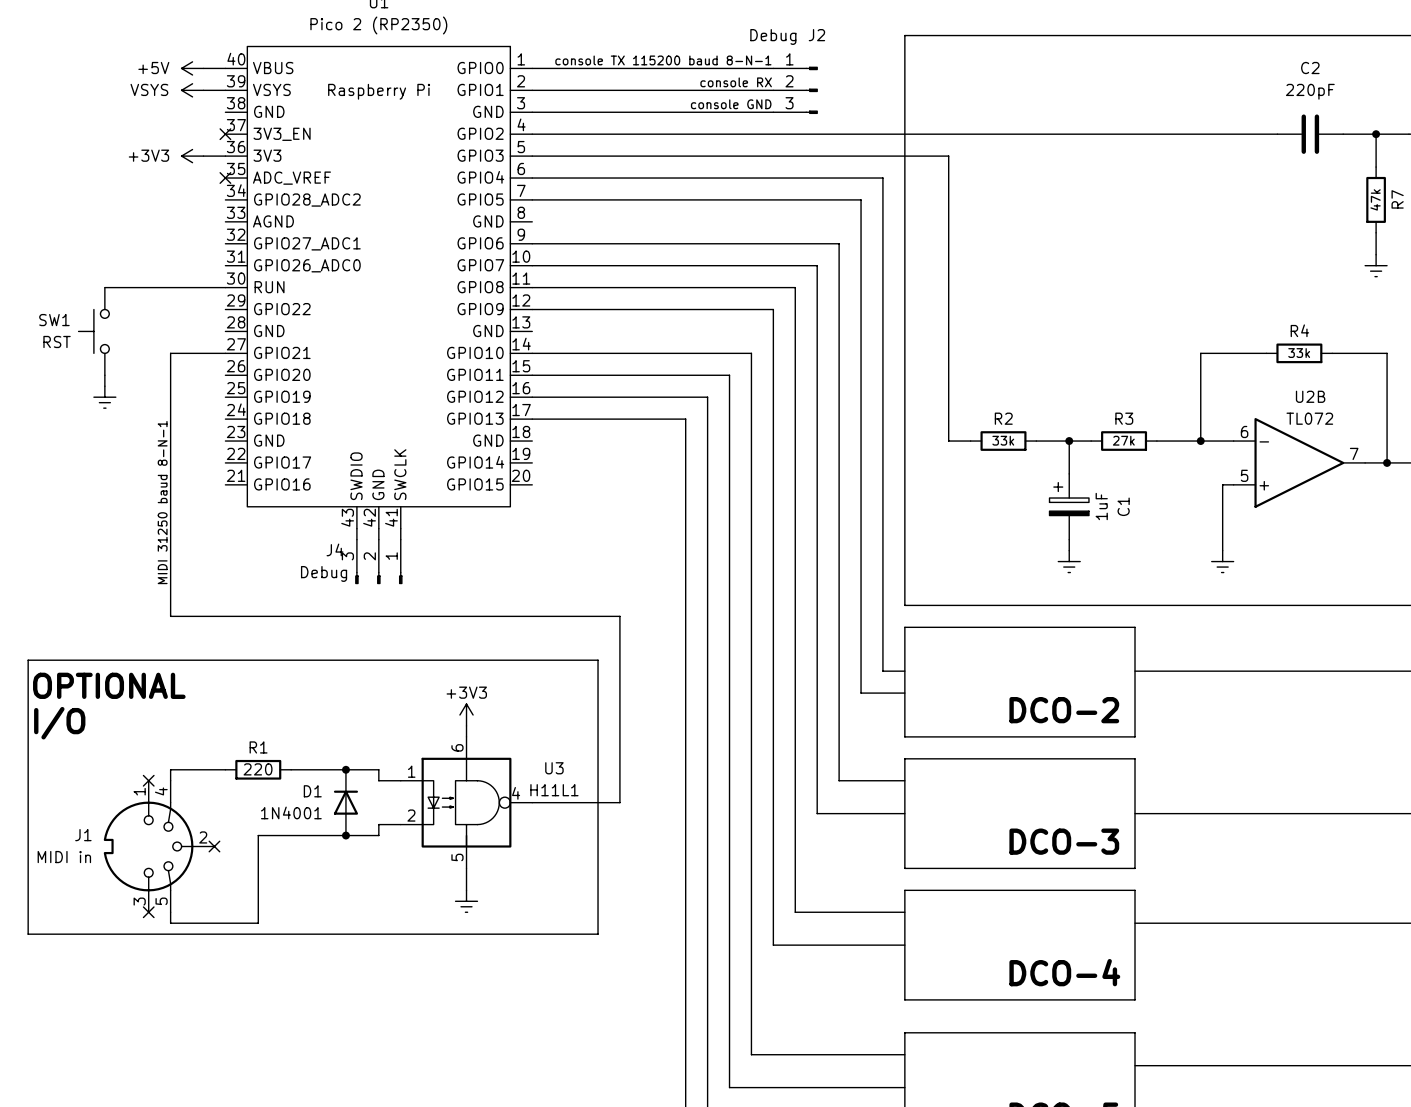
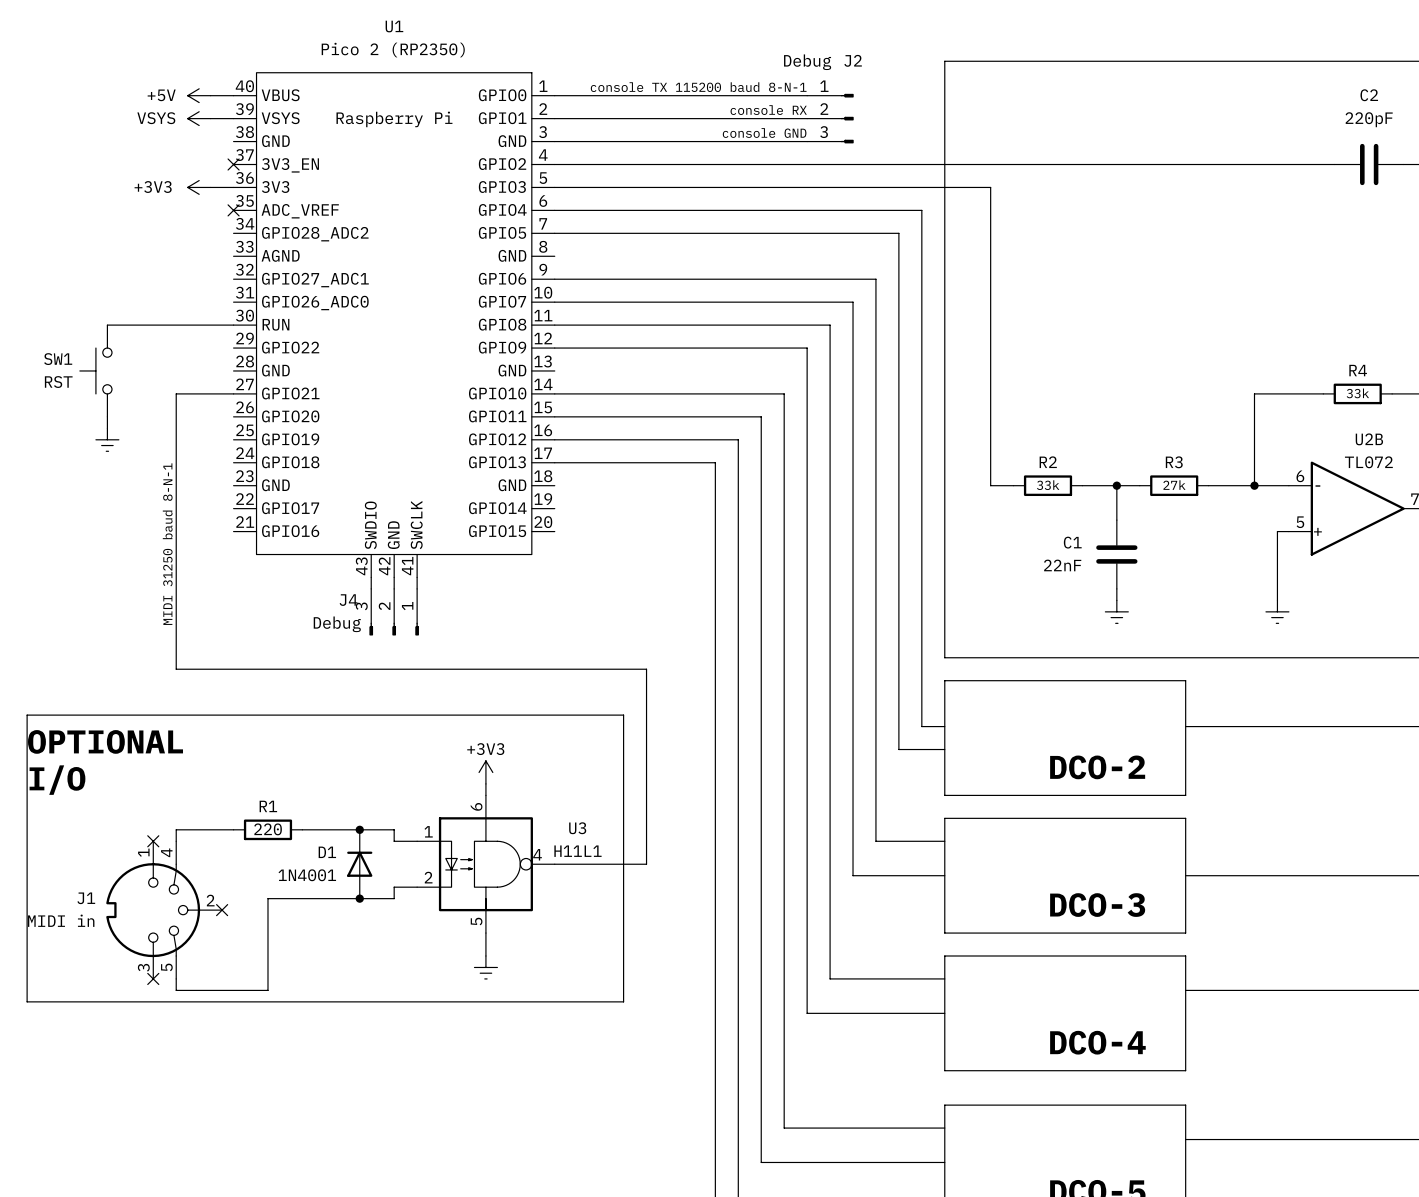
C1 symbol: [1049, 473, 1089, 540] -> [1096, 520, 1138, 589]
C1 value: 1uF (1101, 506) -> 22nF (1062, 565)
C1 name position: C1 (1123, 506) -> C1 (1072, 542)

